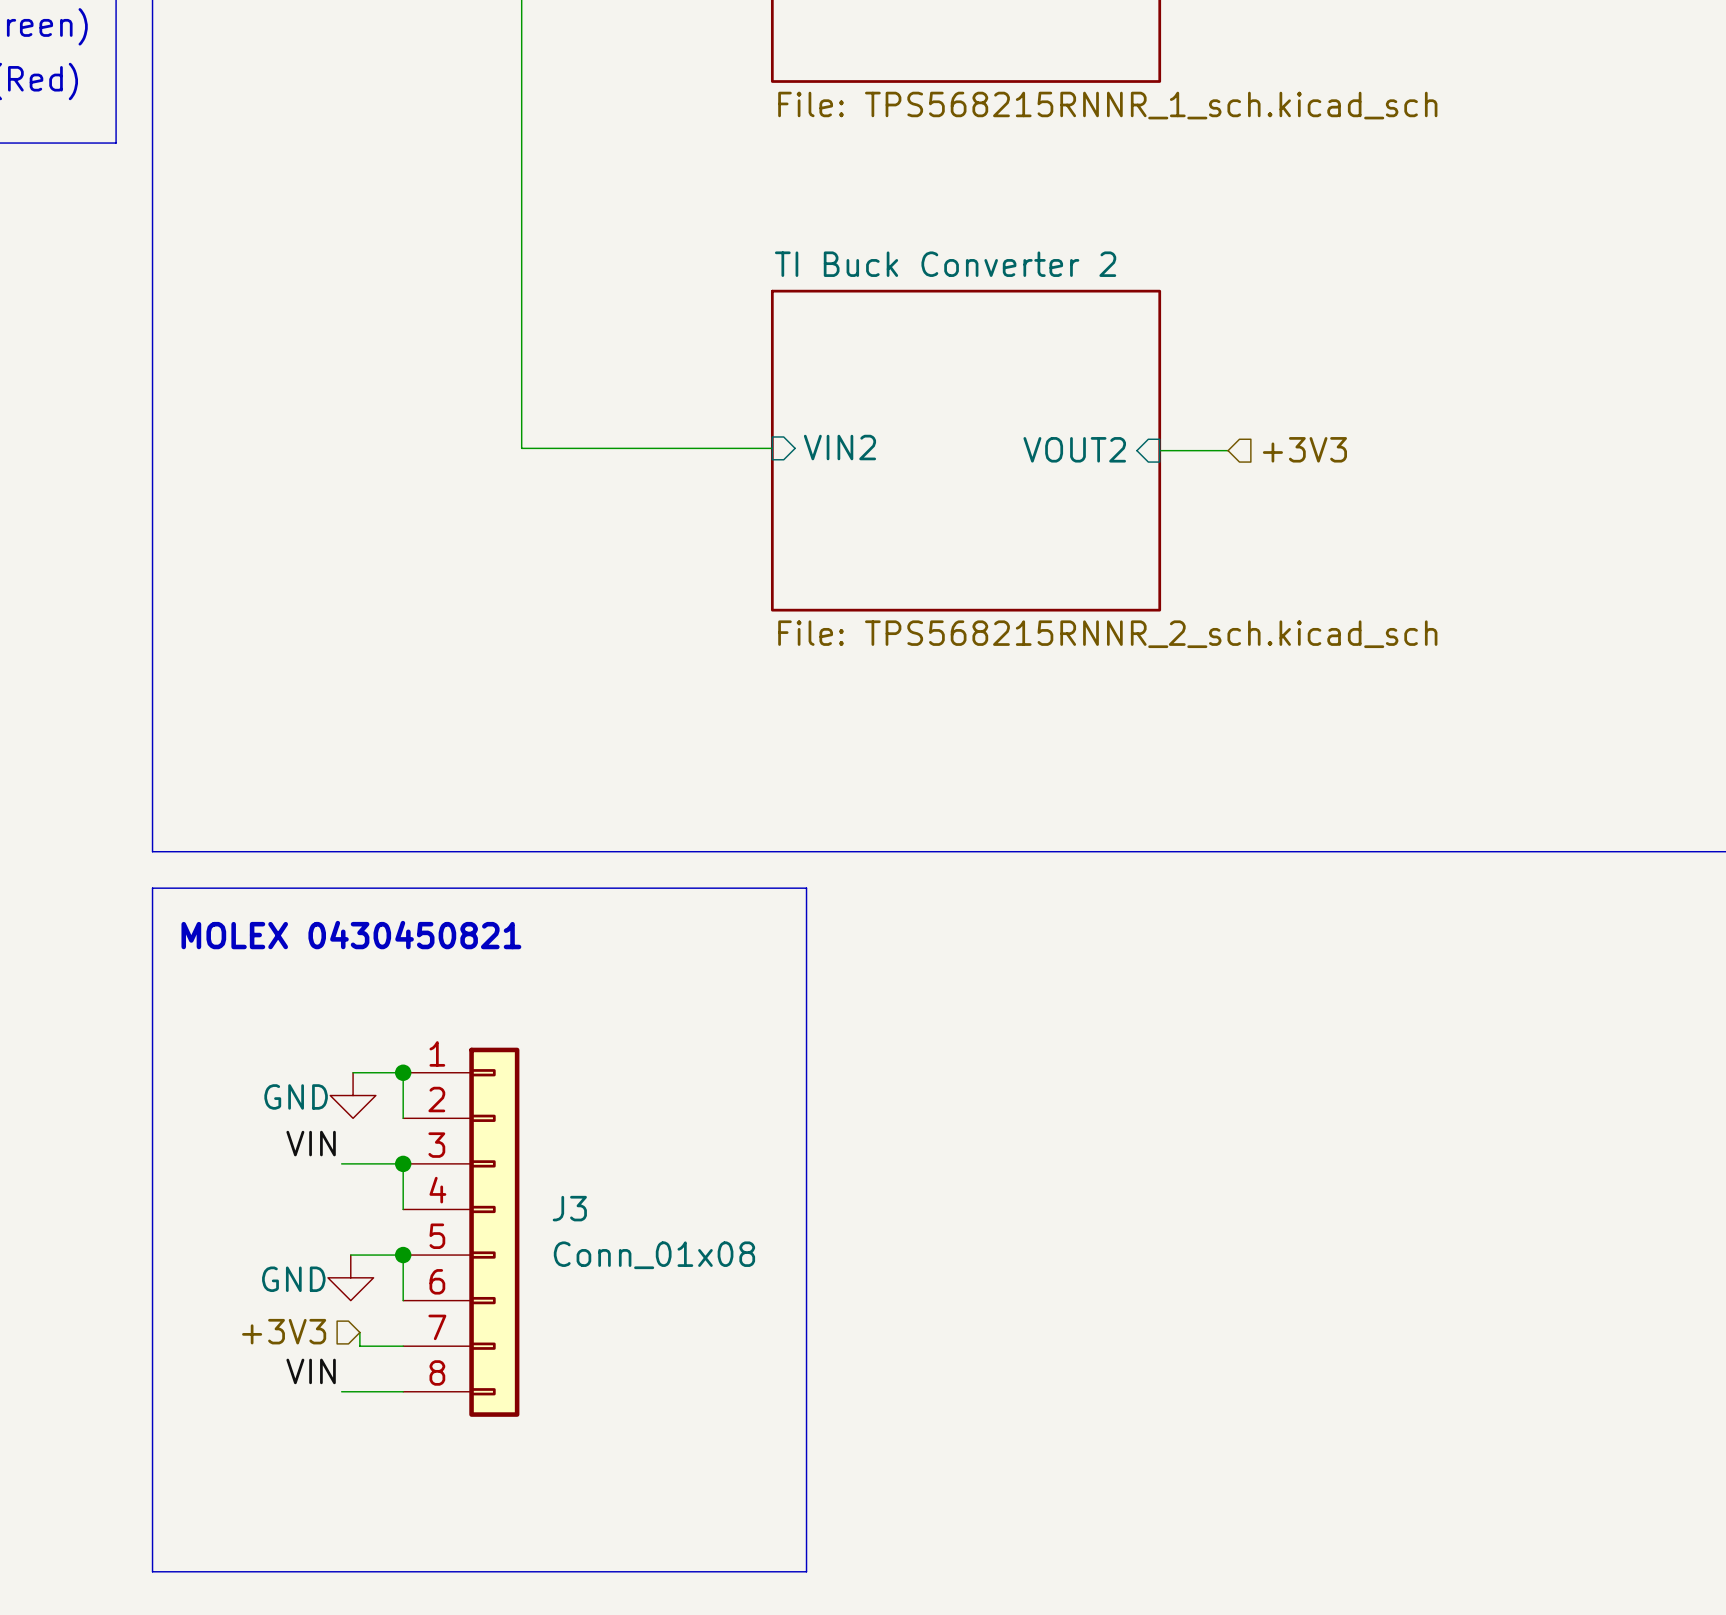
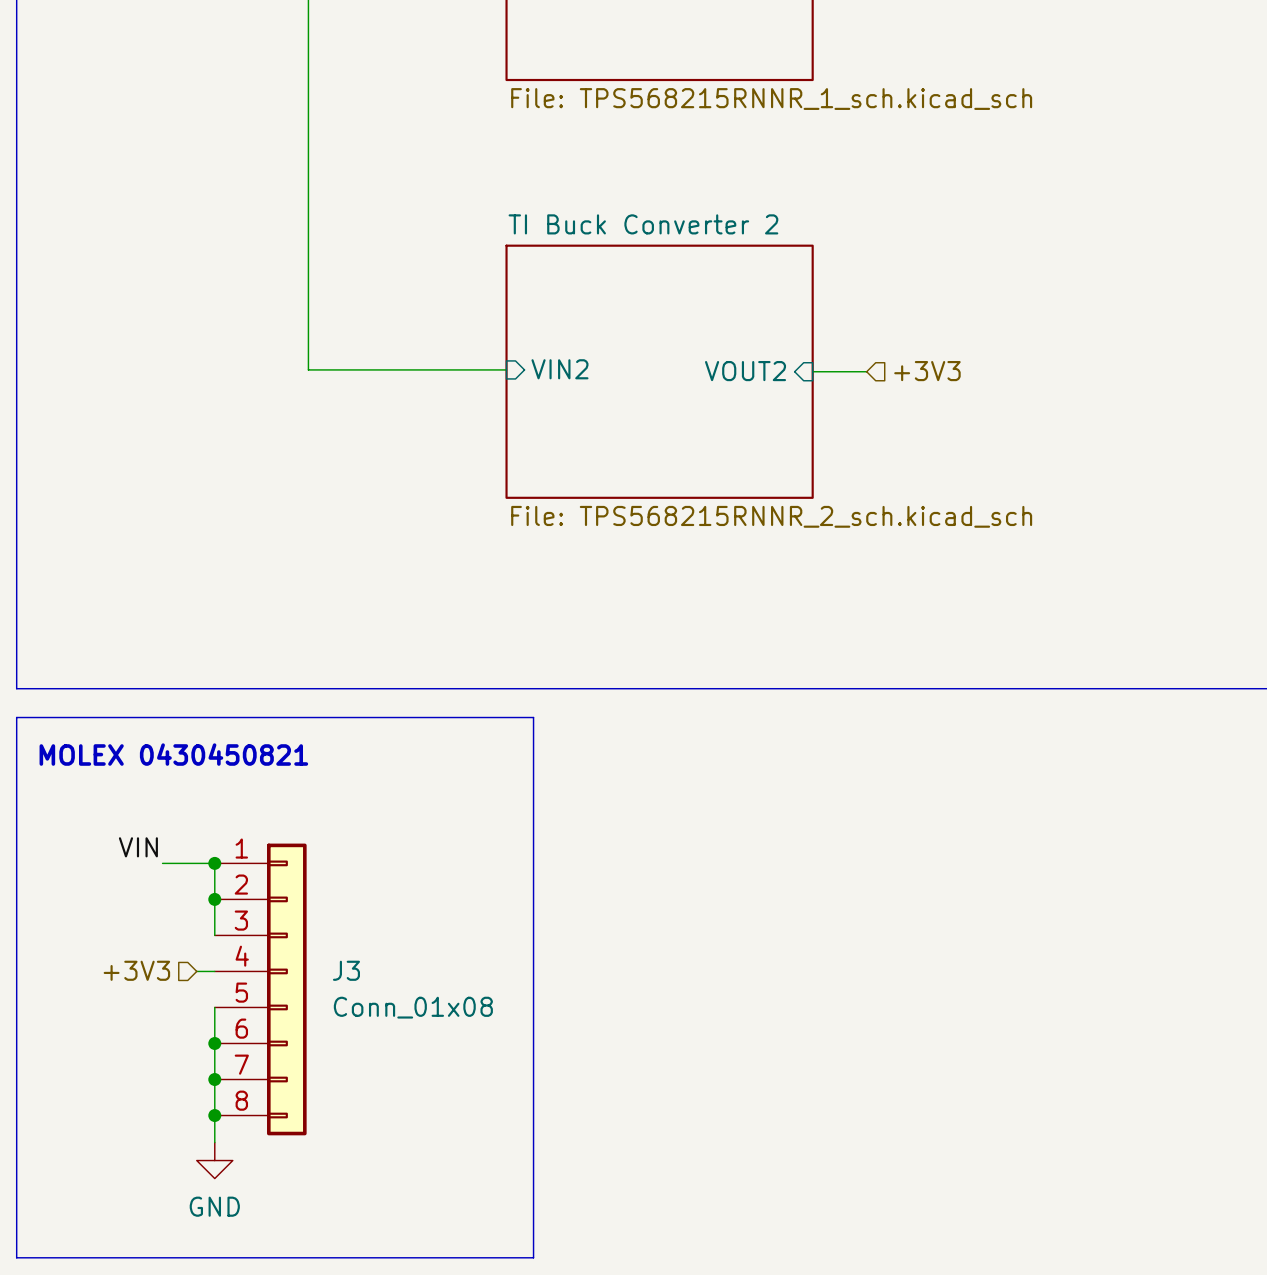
wire: none -> (162, 863) (175, 863)
power symbol: GND (353, 1095) -> none
wire: none -> (214, 899) (214, 935)
label position: VIN (311, 1143) -> VIN (138, 847)
wire: (341, 1163) (403, 1163) (403, 1209) -> (196, 971) (214, 971)
junction position: (403, 1163) -> (214, 899)
wire: (350, 1255) (403, 1255) -> none
junction: (403, 1255) -> none
power symbol: GND (350, 1277) -> none
wire: none -> (214, 1043) (214, 1142)
junction: none -> (214, 1043)
hierarchical label position: +3V3 (284, 1331) -> +3V3 (136, 970)
wire: (359, 1332) (359, 1346) (403, 1346) -> none
junction: none -> (214, 1079)
label: VIN (311, 1371) -> none
wire: (341, 1391) (403, 1391) -> none
junction: none -> (214, 1115)
power symbol: none -> GND (214, 1160)

